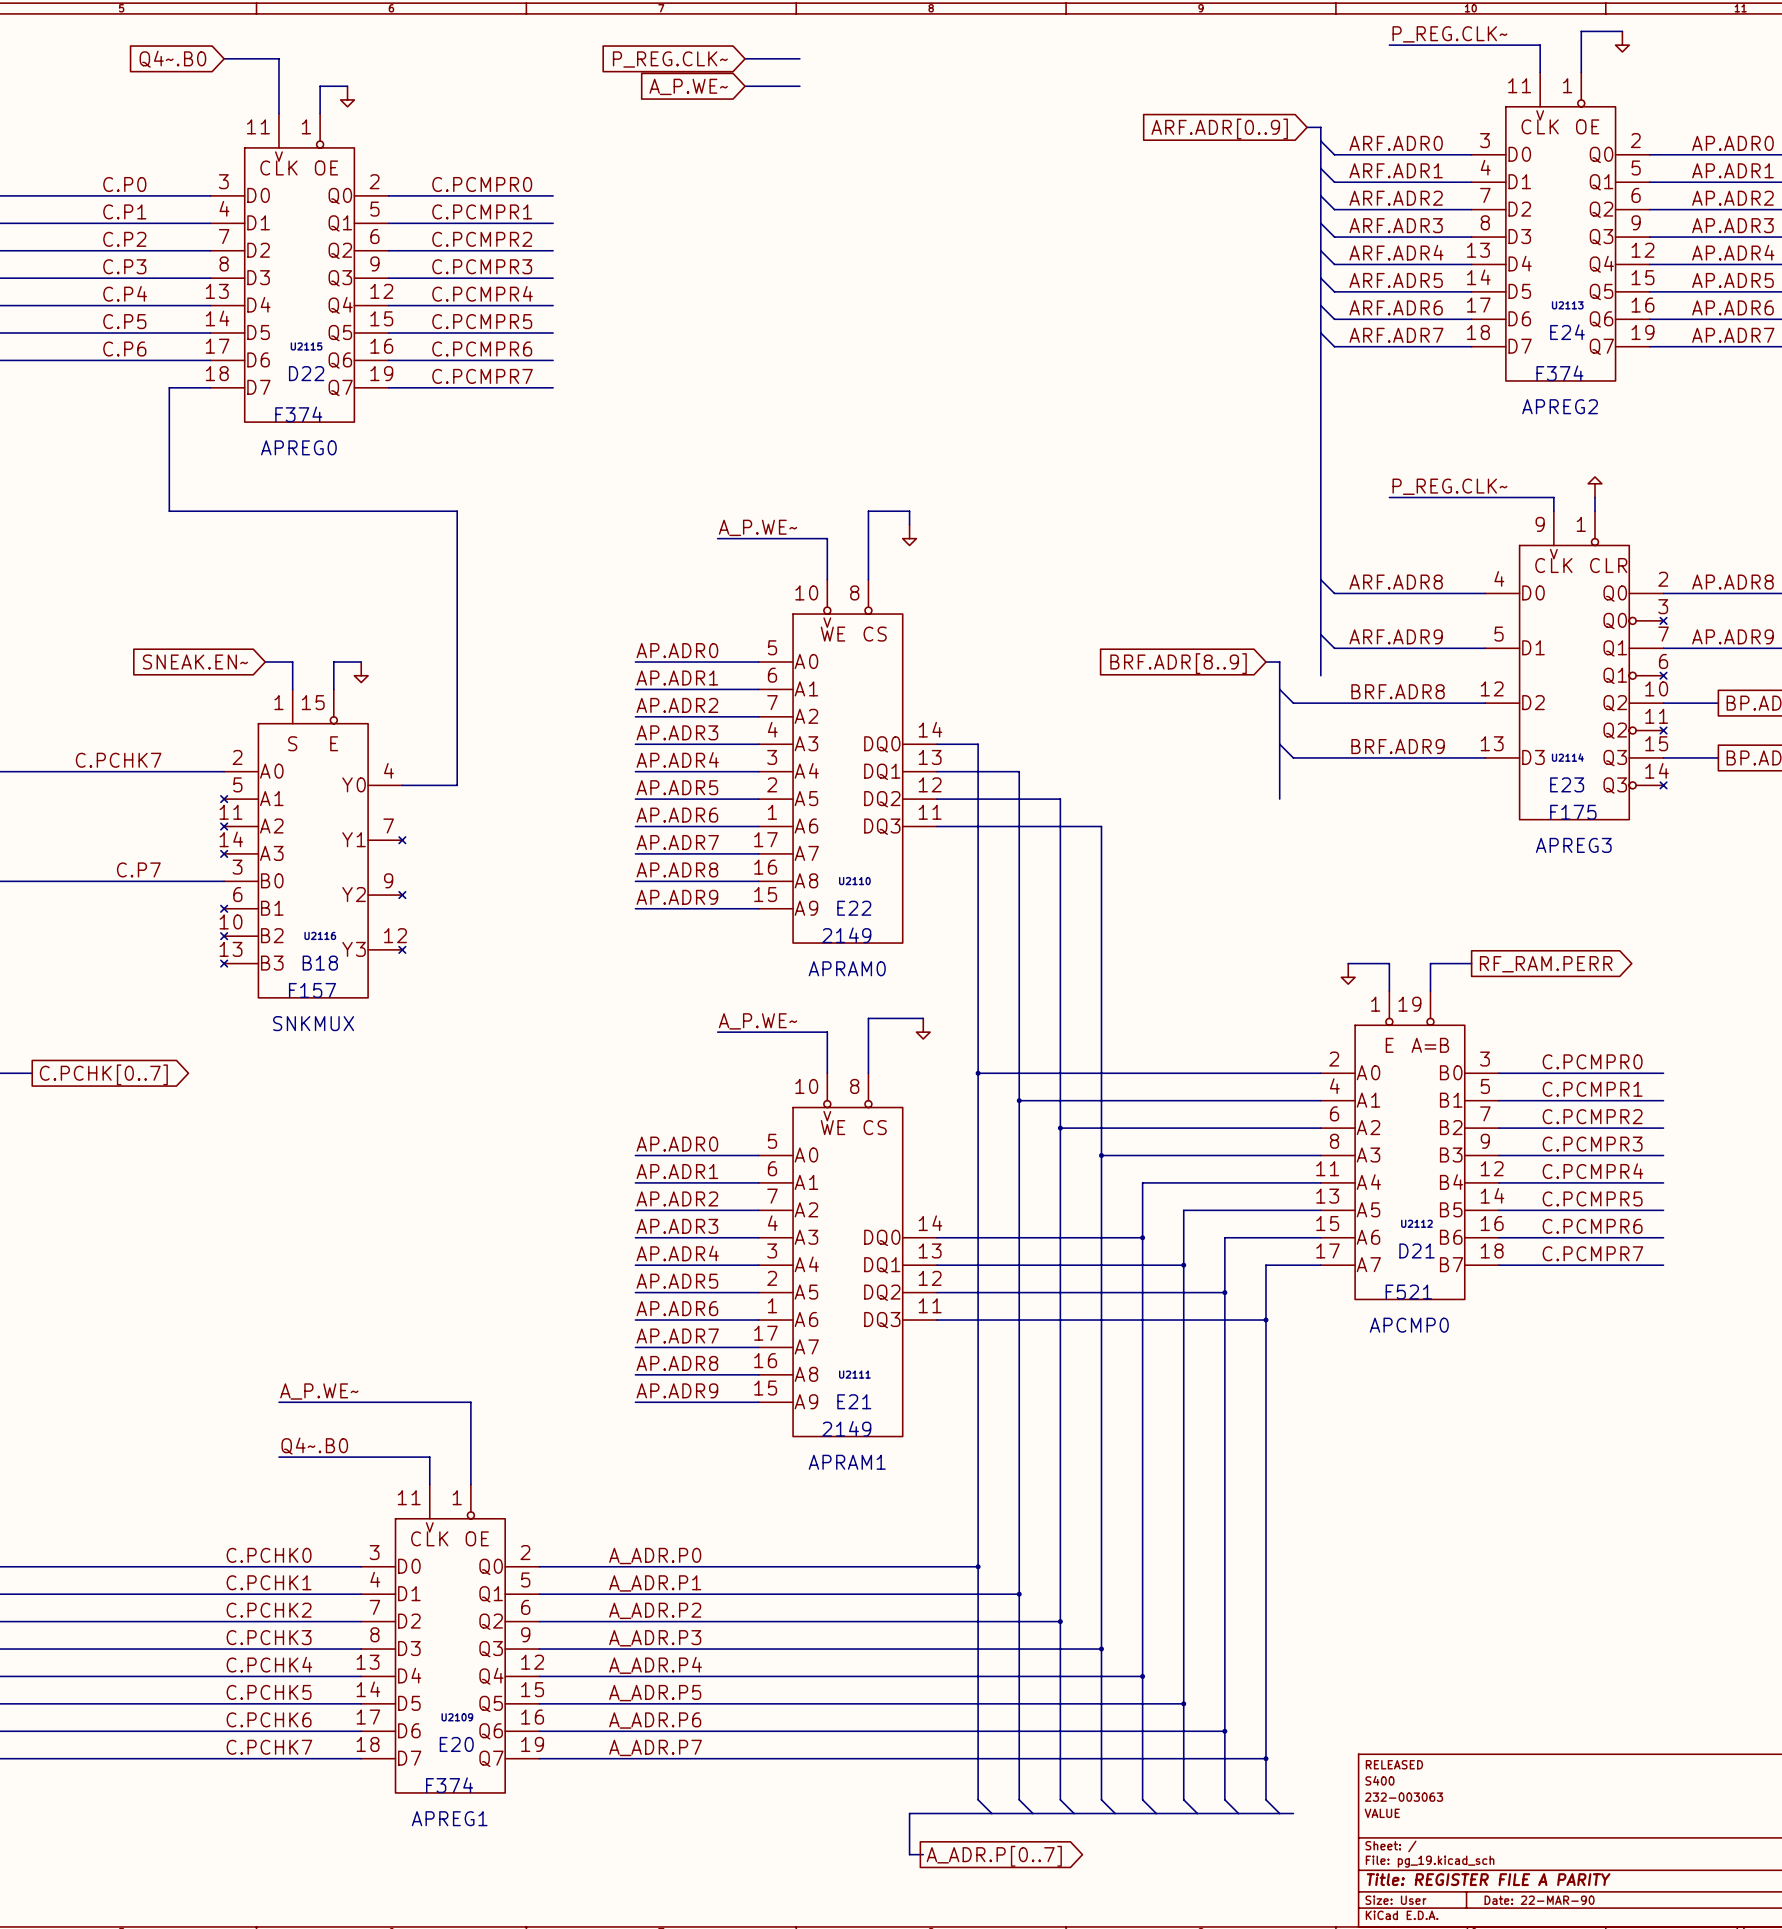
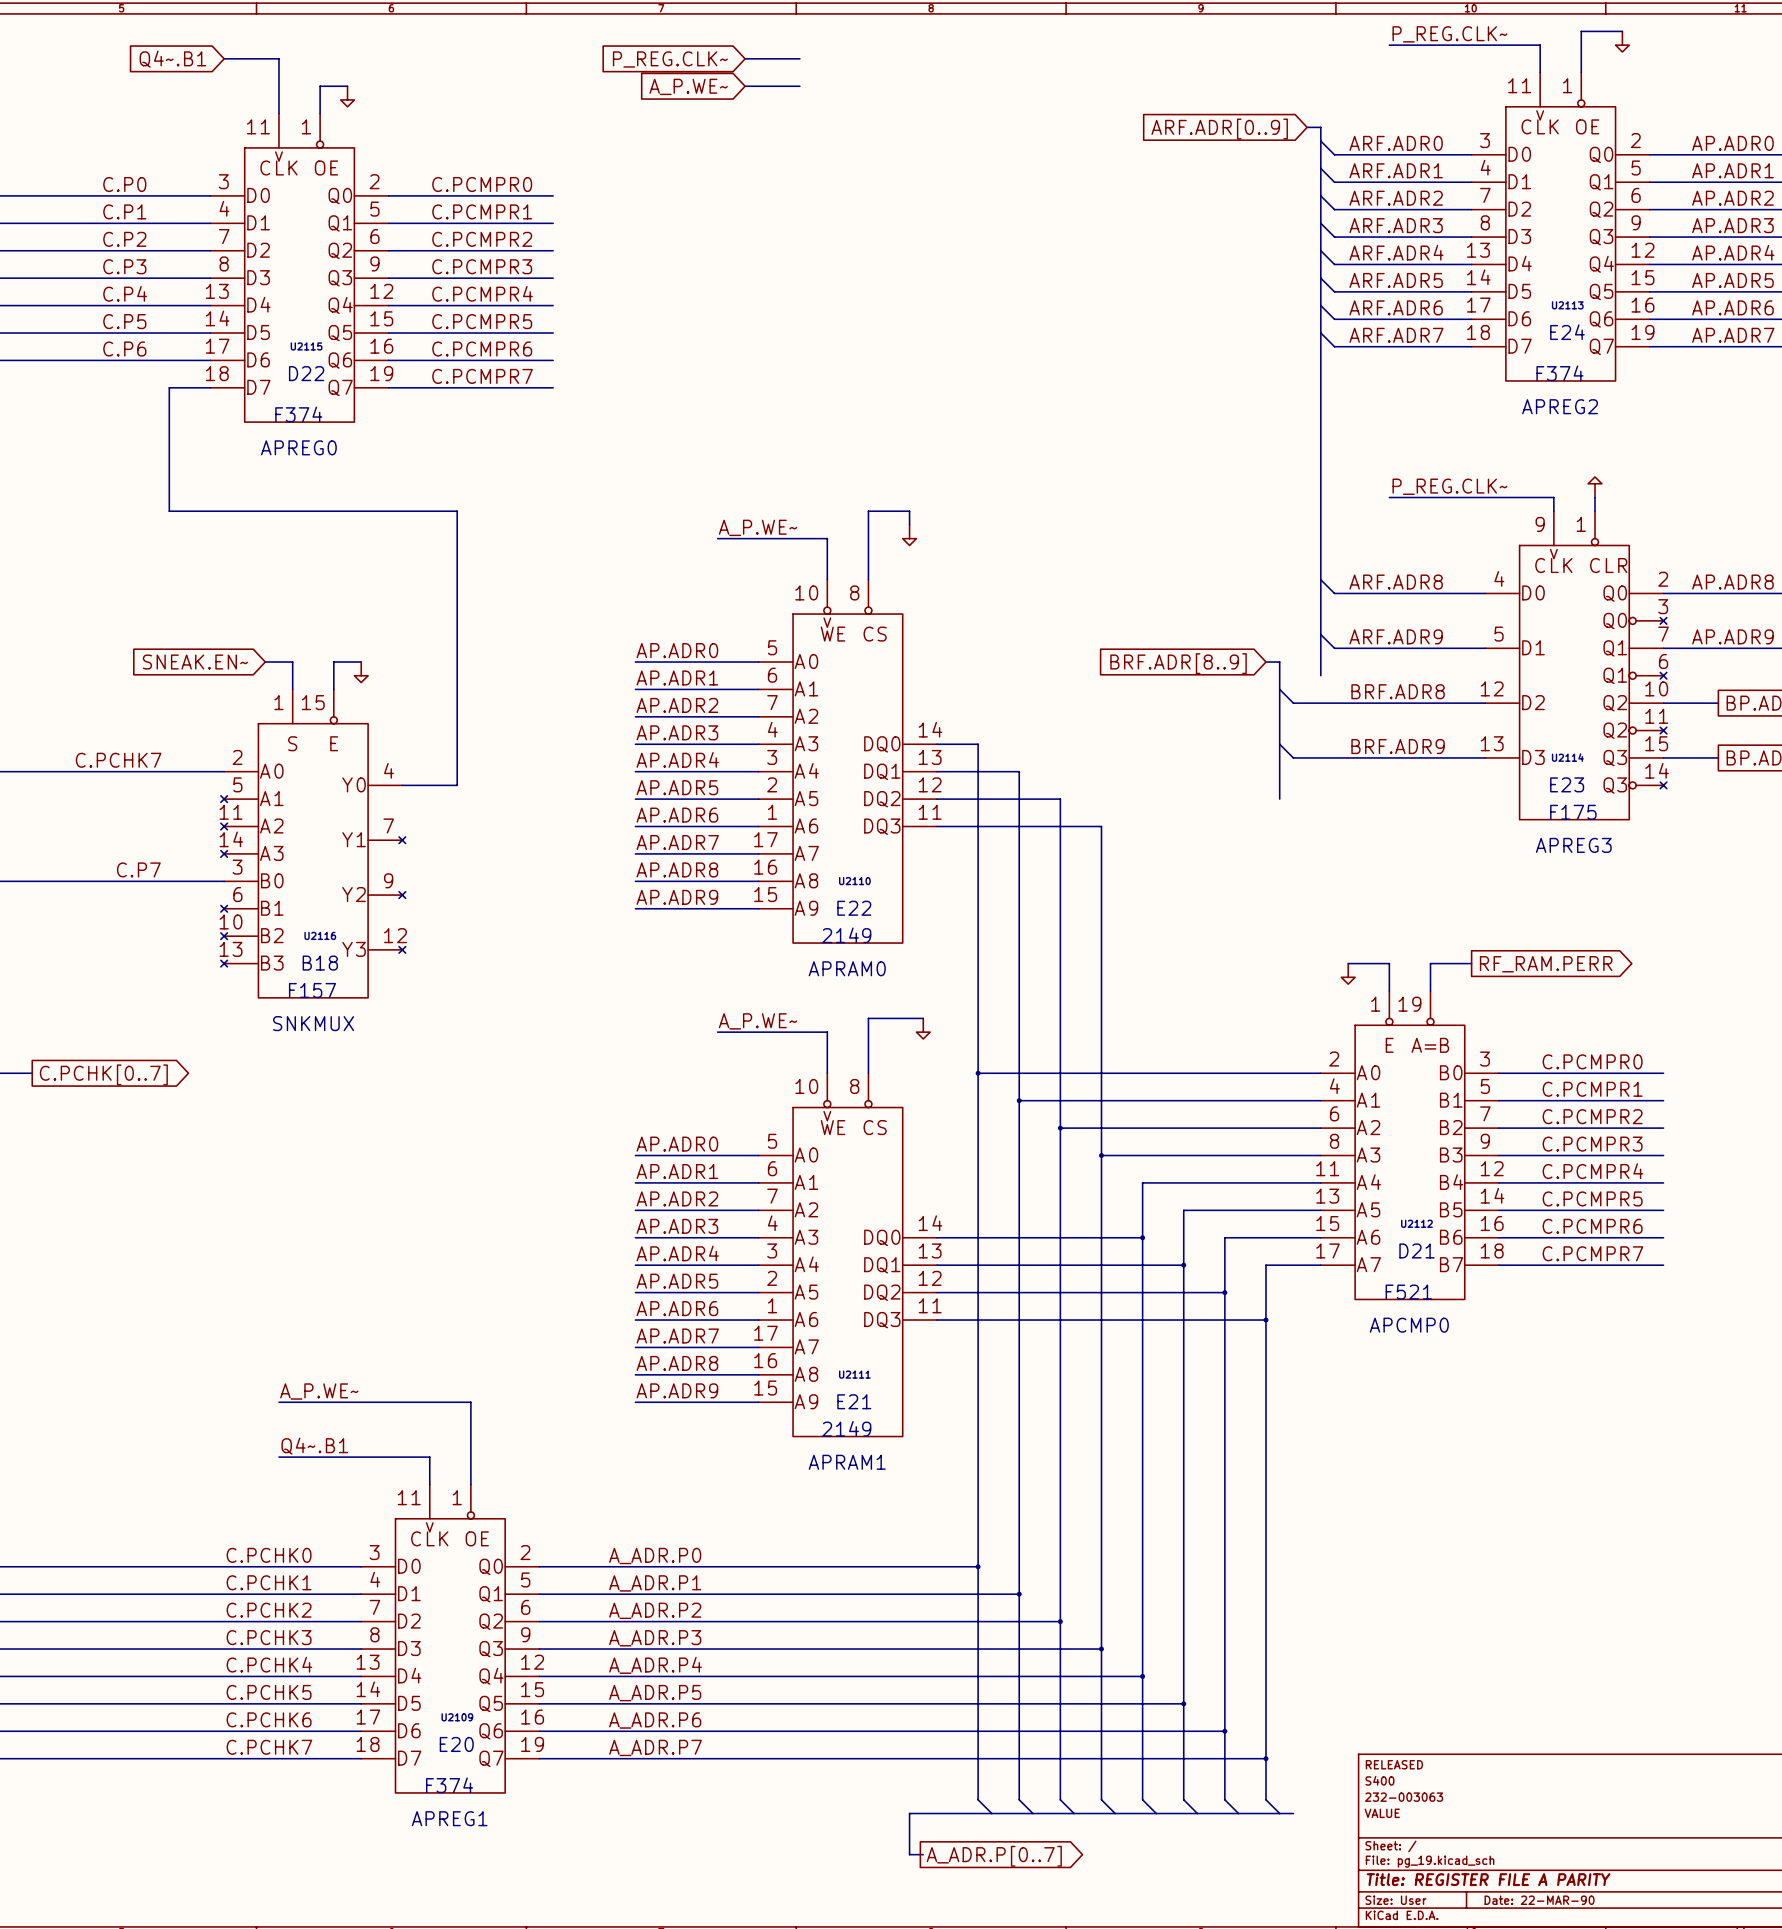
global label: Q4~.B0 (172, 59) -> Q4~.B1 (172, 59)
label: Q4~.B0 (314, 1446) -> Q4~.B1 (314, 1446)

